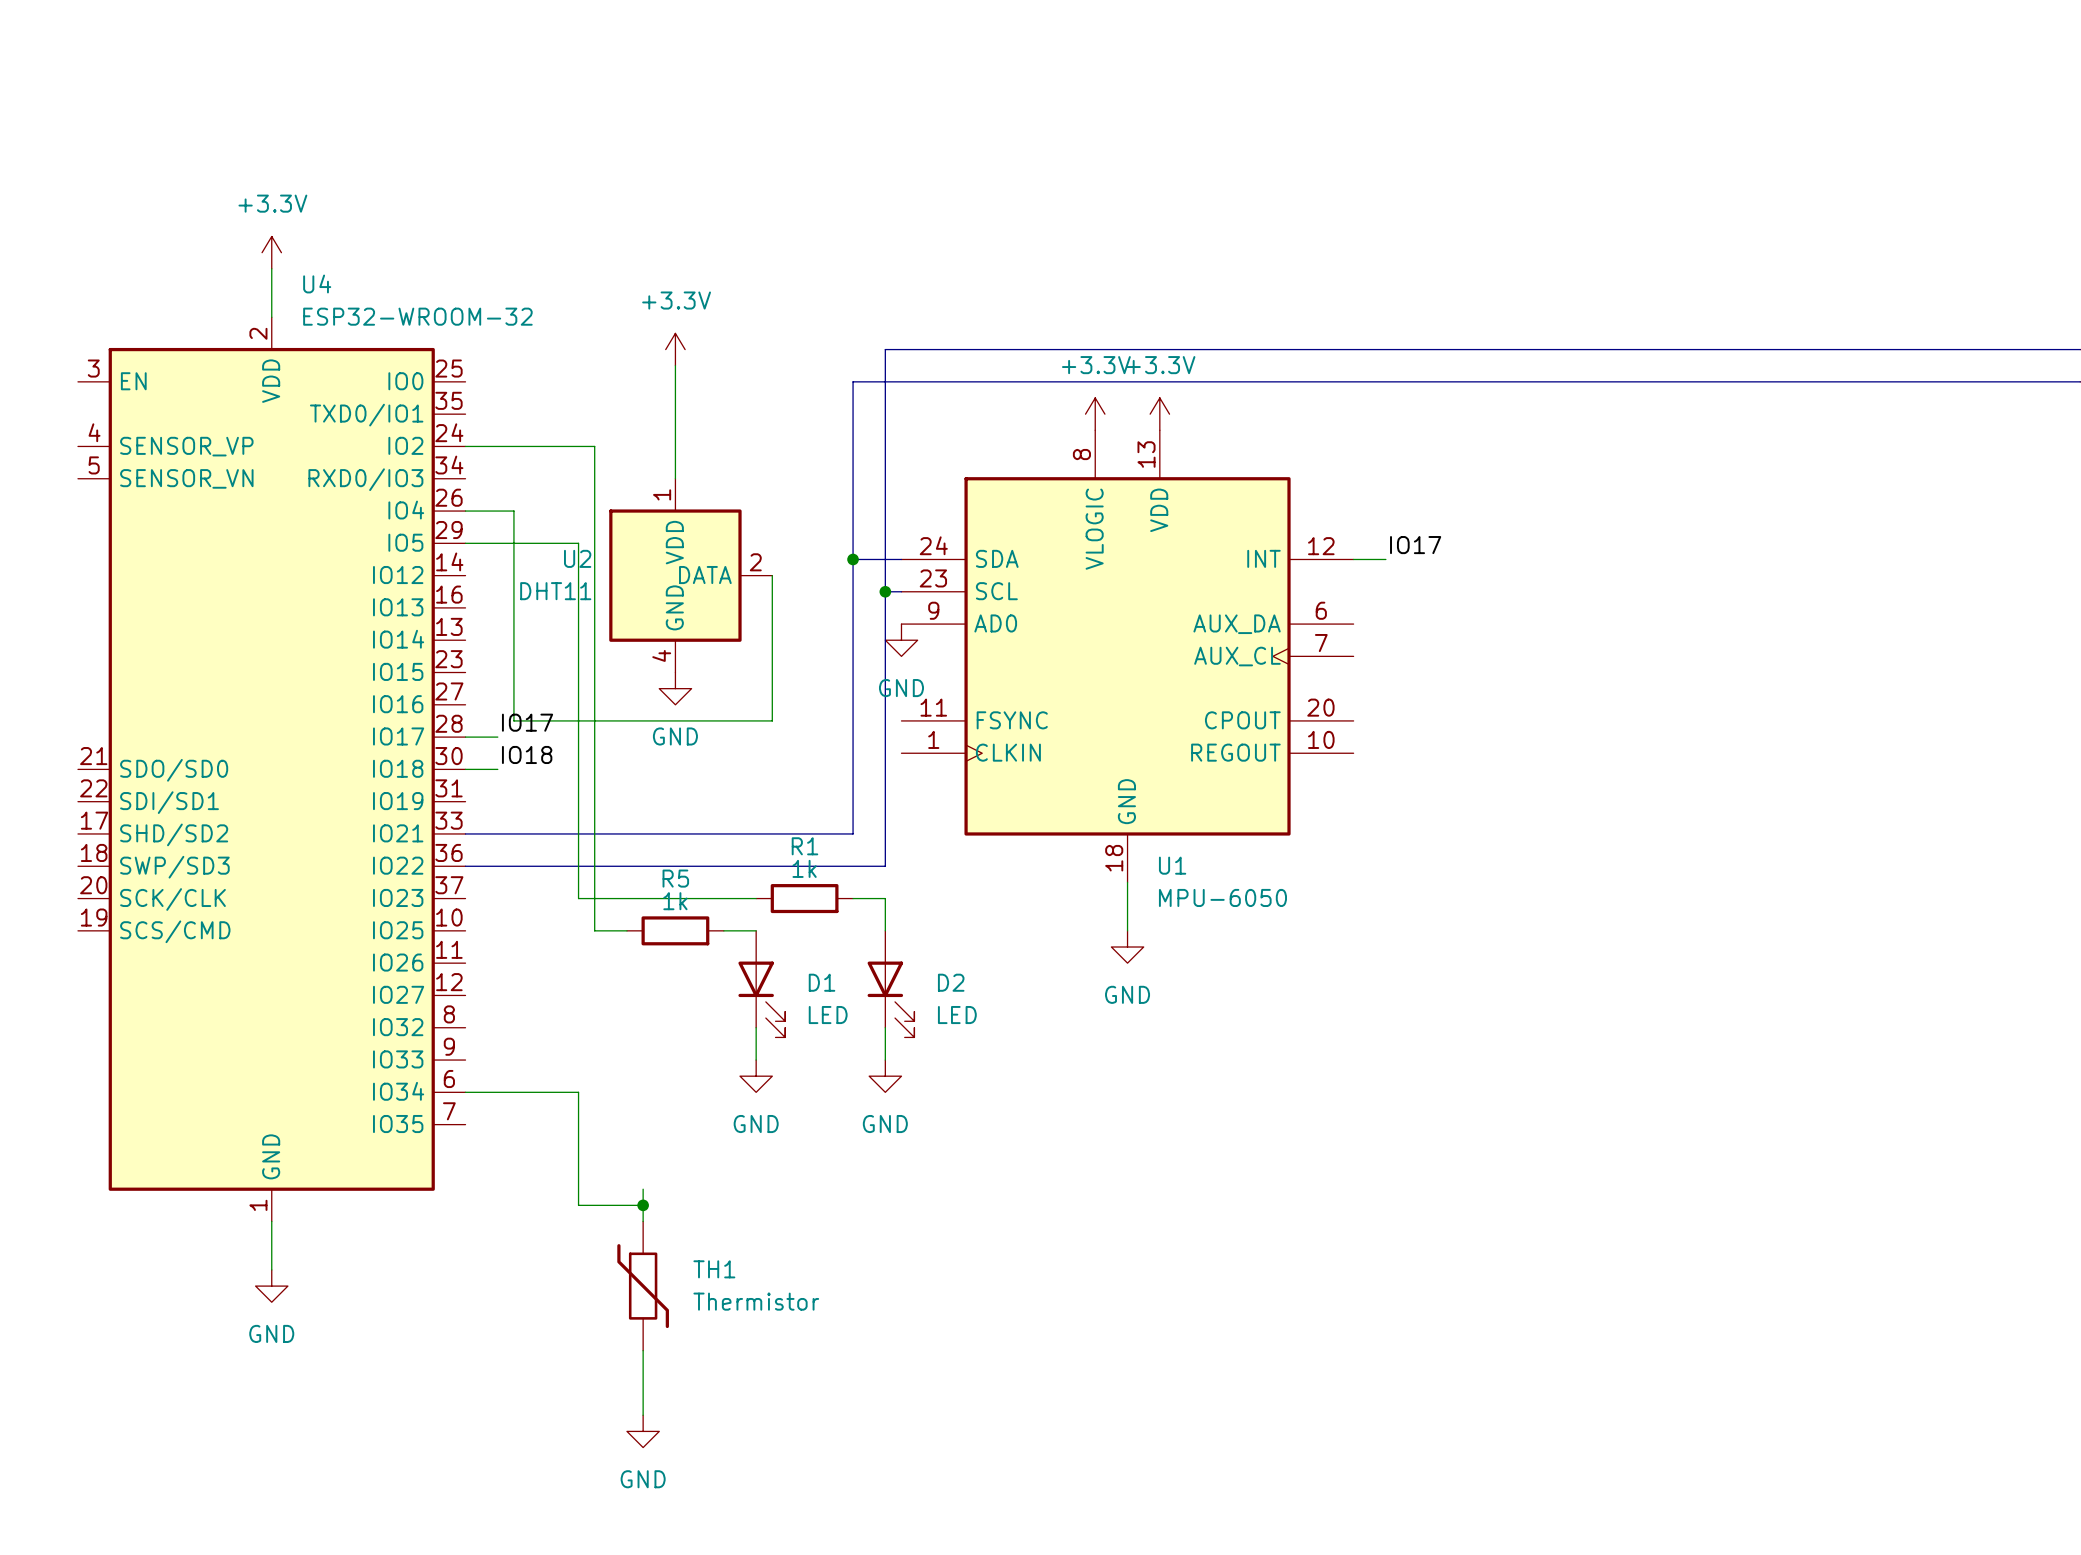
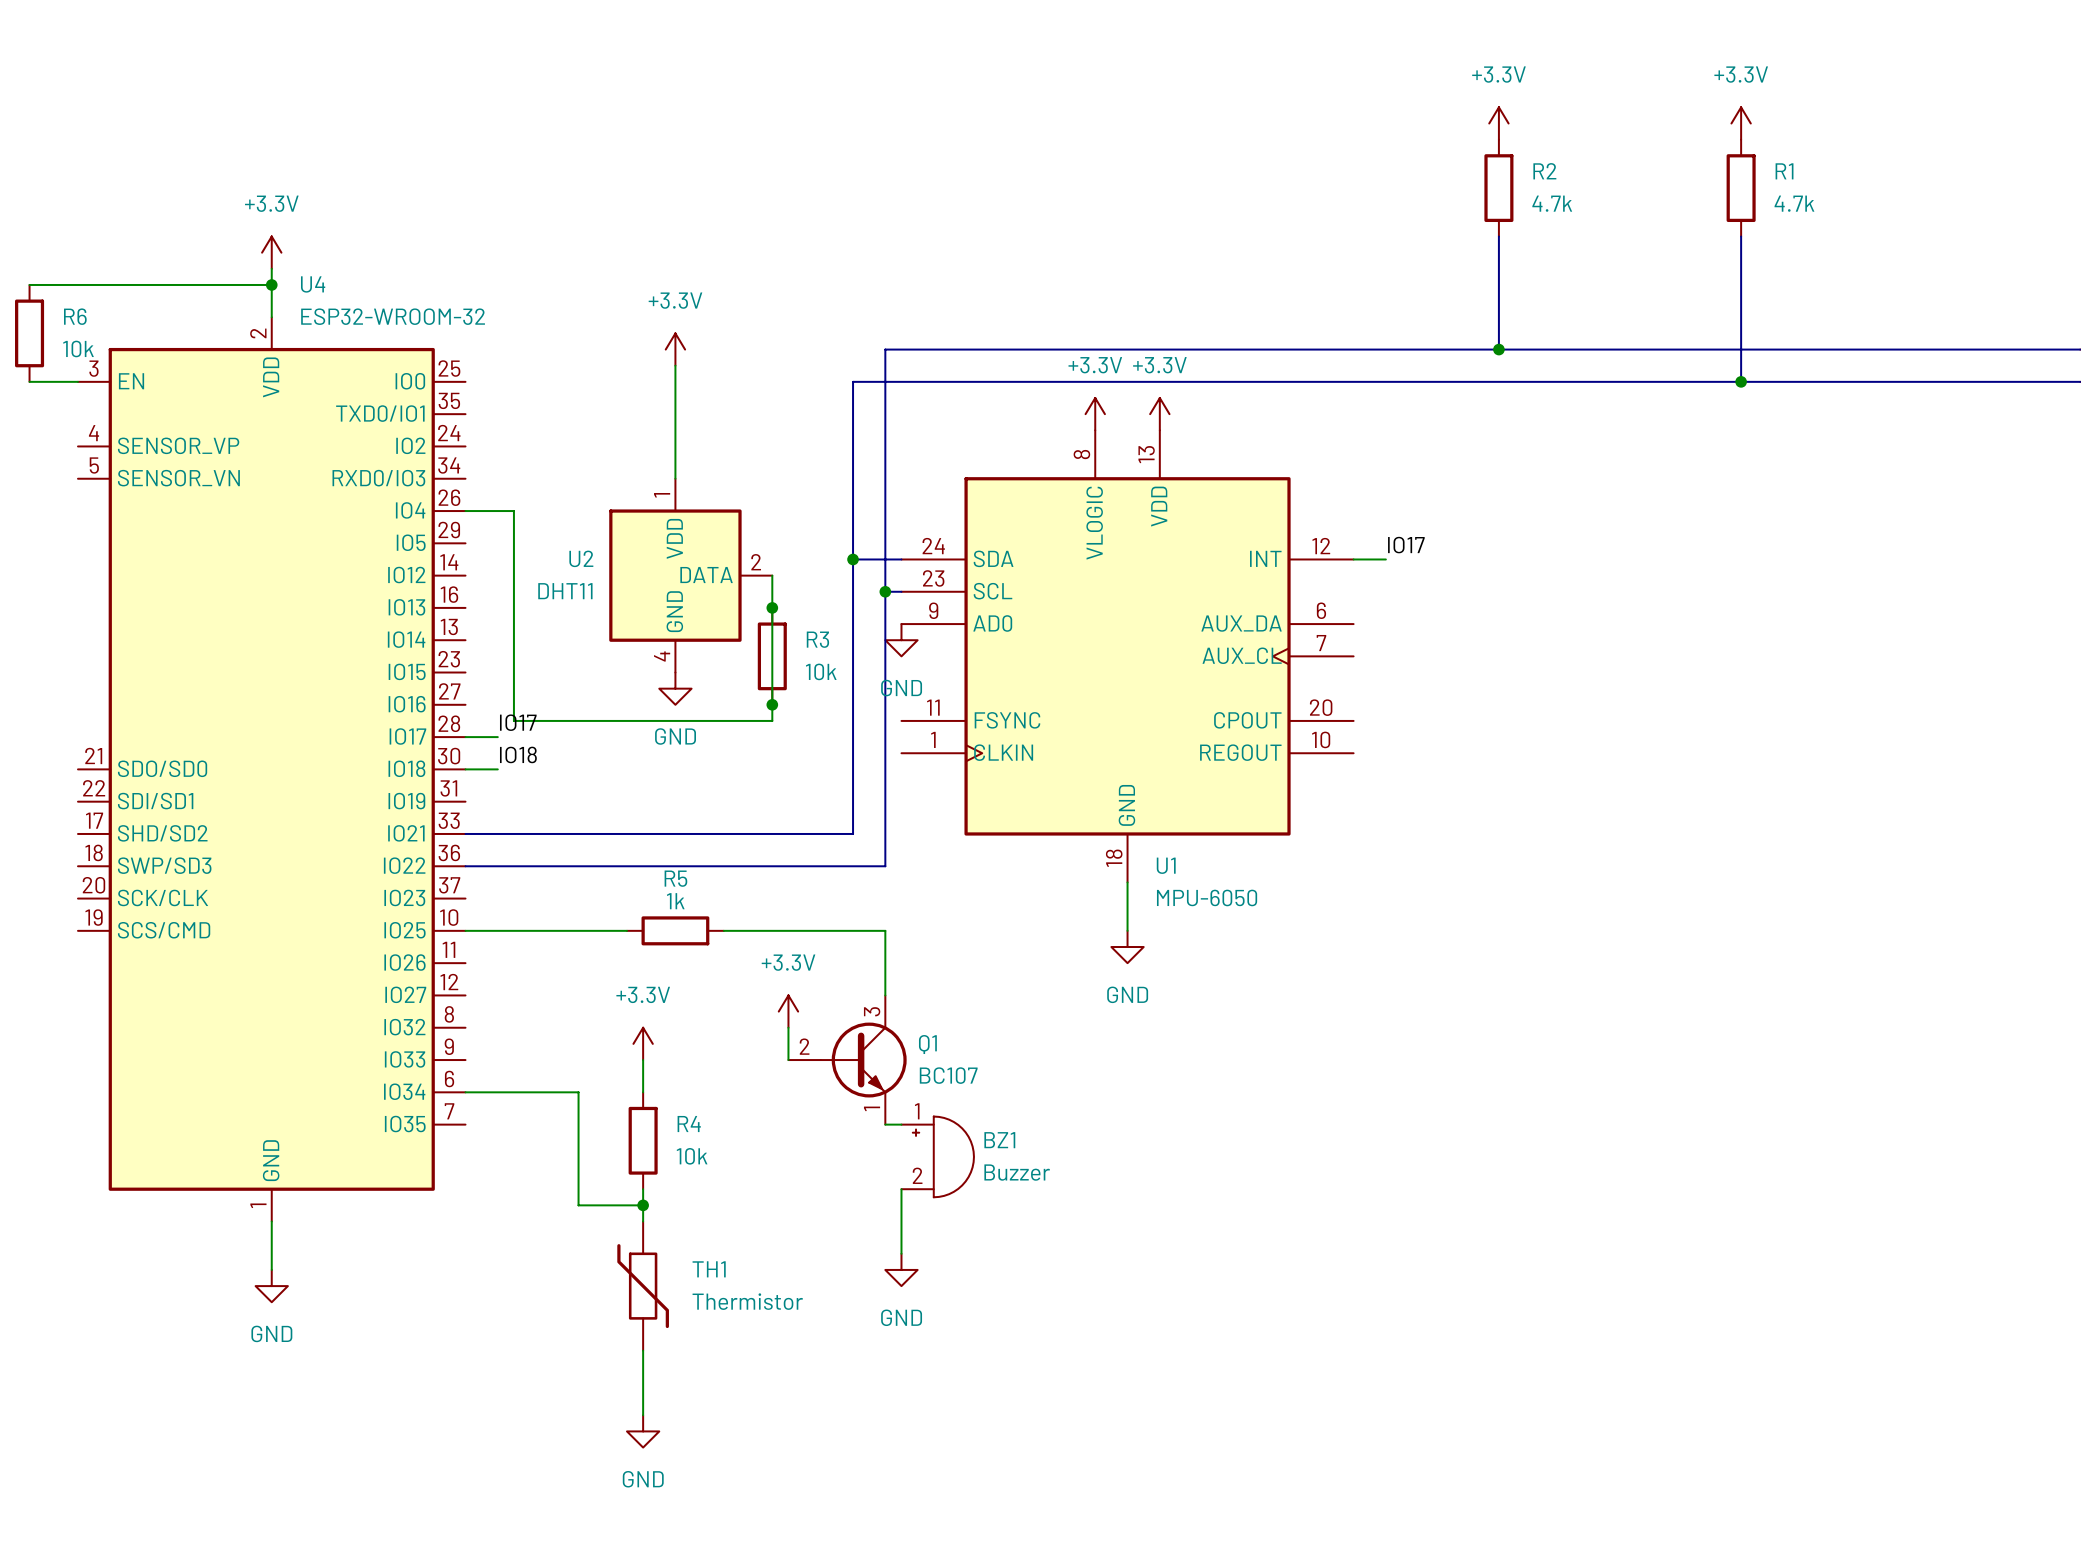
power symbol: none -> +3.3V (1498, 123)
power symbol: none -> +3.3V (1741, 123)
R2: none -> 4.7k (1498, 188)
bus: none -> (1498, 236) (1498, 349)
bus: none -> (1741, 236) (1741, 381)
wire: none -> (29, 284) (271, 284)
junction: none -> (271, 284)
R6: none -> 10k (29, 333)
junction: none -> (1498, 349)
wire: none -> (29, 381) (77, 381)
junction: none -> (1741, 381)
wire: (465, 446) (594, 446) (594, 930) -> (465, 930) (594, 930)
wire: (465, 543) (578, 543) (578, 898) (756, 898) -> none
junction: none -> (772, 607)
R3: none -> 10k (772, 656)
junction: none -> (772, 704)
R1 value: 1k (804, 868) -> 4.7k (1794, 203)
R1 rotation: 0° (804, 898) -> 90° clockwise (1741, 188)
R1 position: (804, 898) -> (1741, 188)
wire: (853, 898) (885, 898) (885, 930) -> none
wire: none -> (756, 930) (885, 930) (885, 995)
D1: LED (761, 984) -> none
D2: LED (890, 984) -> none
power symbol: none -> +3.3V (788, 1011)
wire: (756, 1027) (756, 1060) -> (788, 1027) (788, 1060)
wire: (885, 1027) (885, 1060) -> (643, 1060) (643, 1092)
power symbol: none -> +3.3V (643, 1043)
Q1: none -> BC107 (847, 1060)
power symbol: GND (756, 1076) -> none
power symbol: GND (885, 1076) -> none
wire: none -> (885, 1124) (901, 1124)
R4: none -> 10k (643, 1140)
BZ1: none -> Buzzer (937, 1156)
wire: none -> (901, 1189) (901, 1253)
power symbol: none -> GND (901, 1269)

